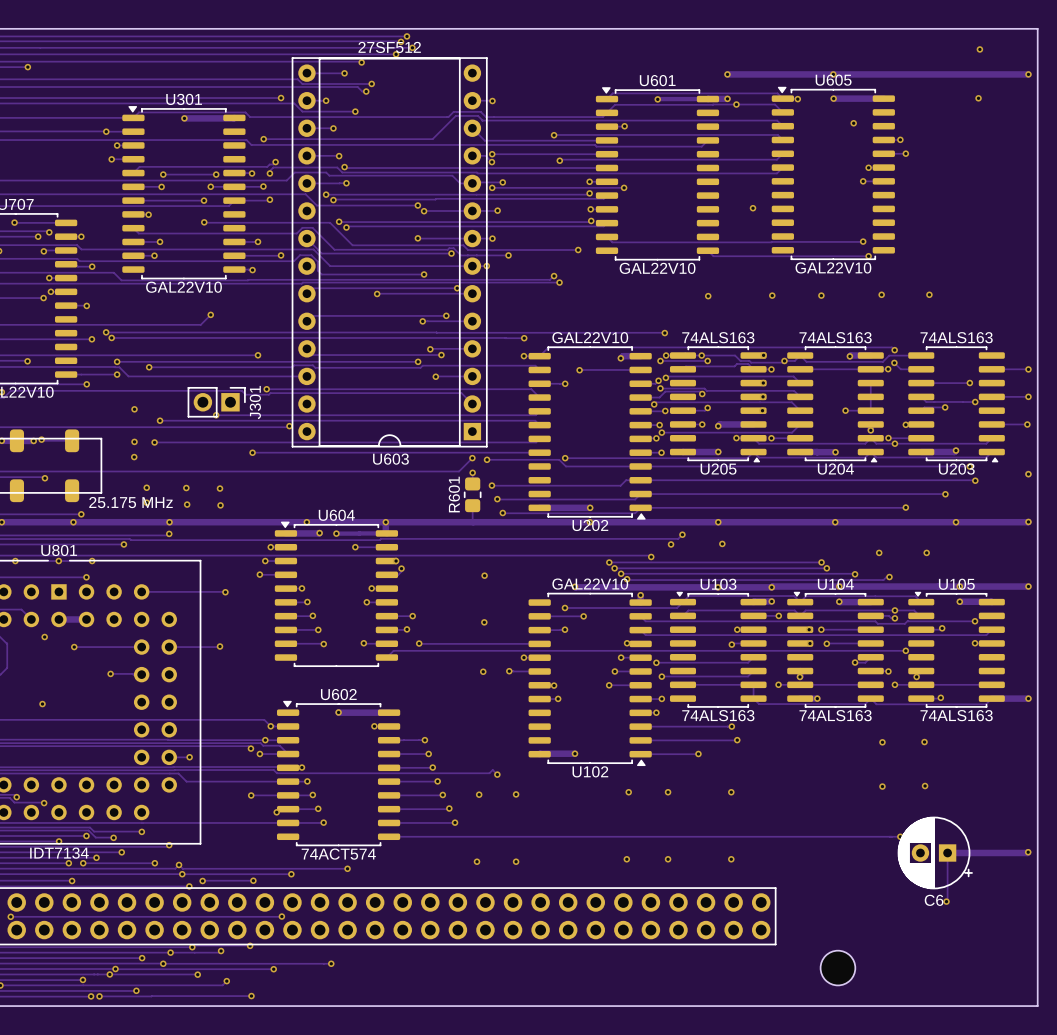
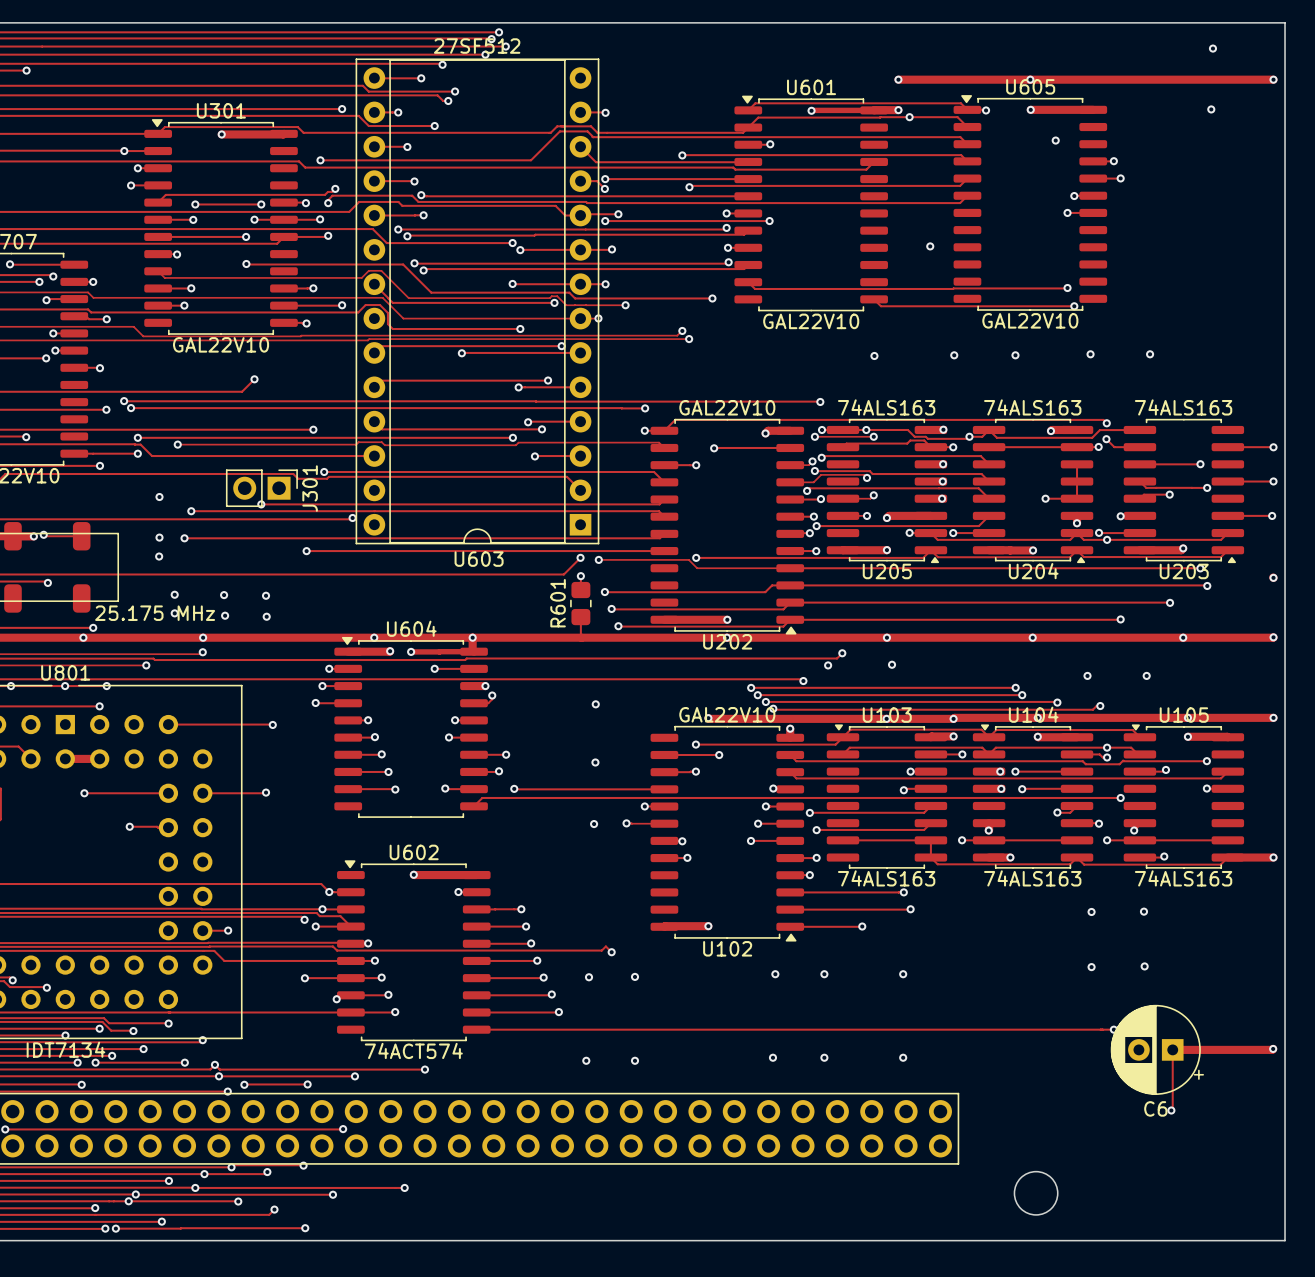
via: (44, 637) -> none
via: (42, 704) -> none

